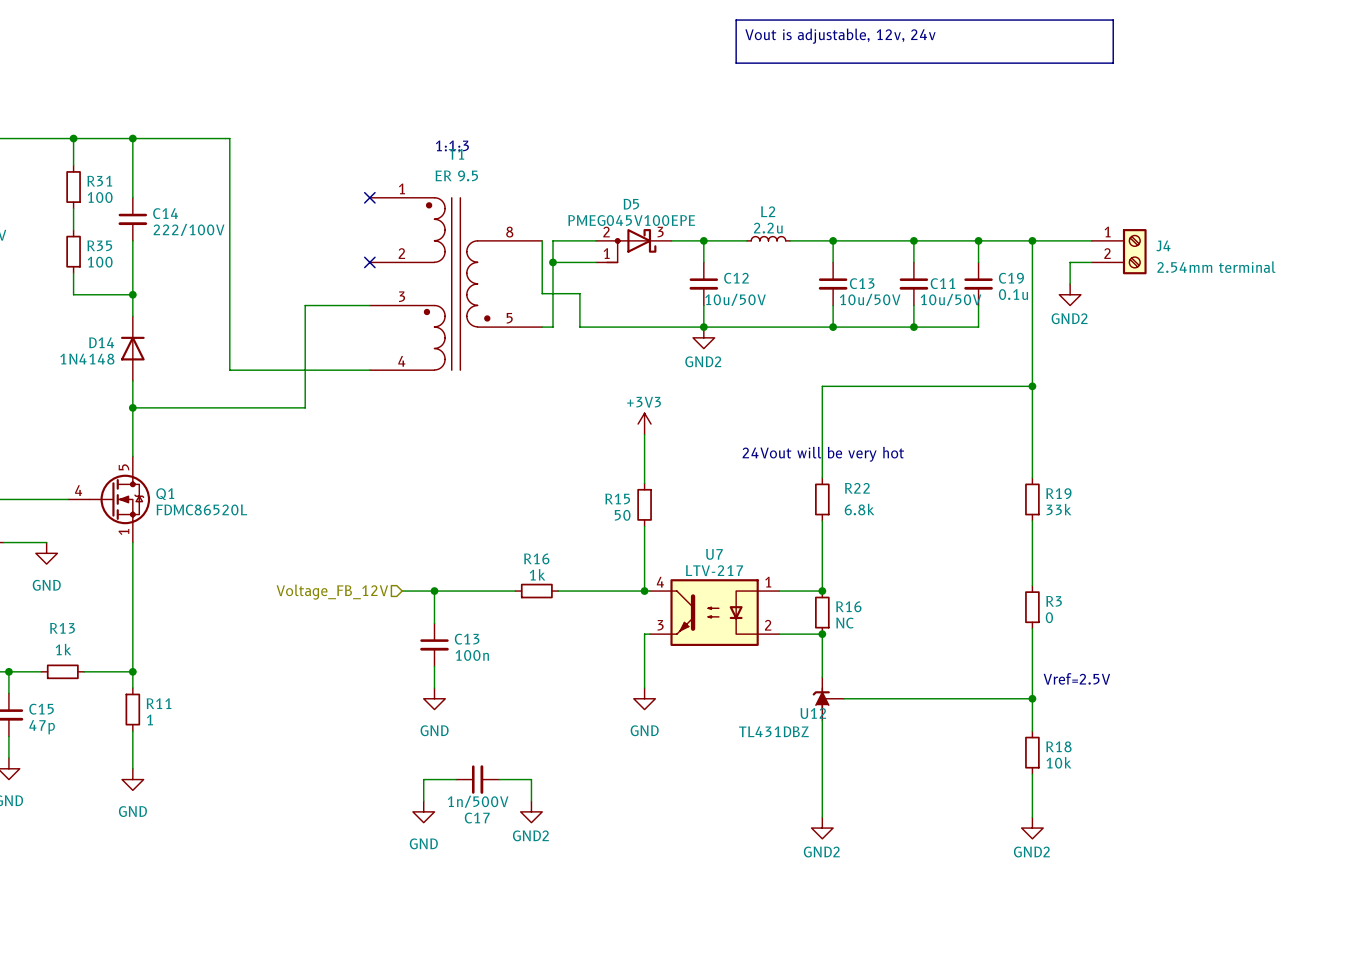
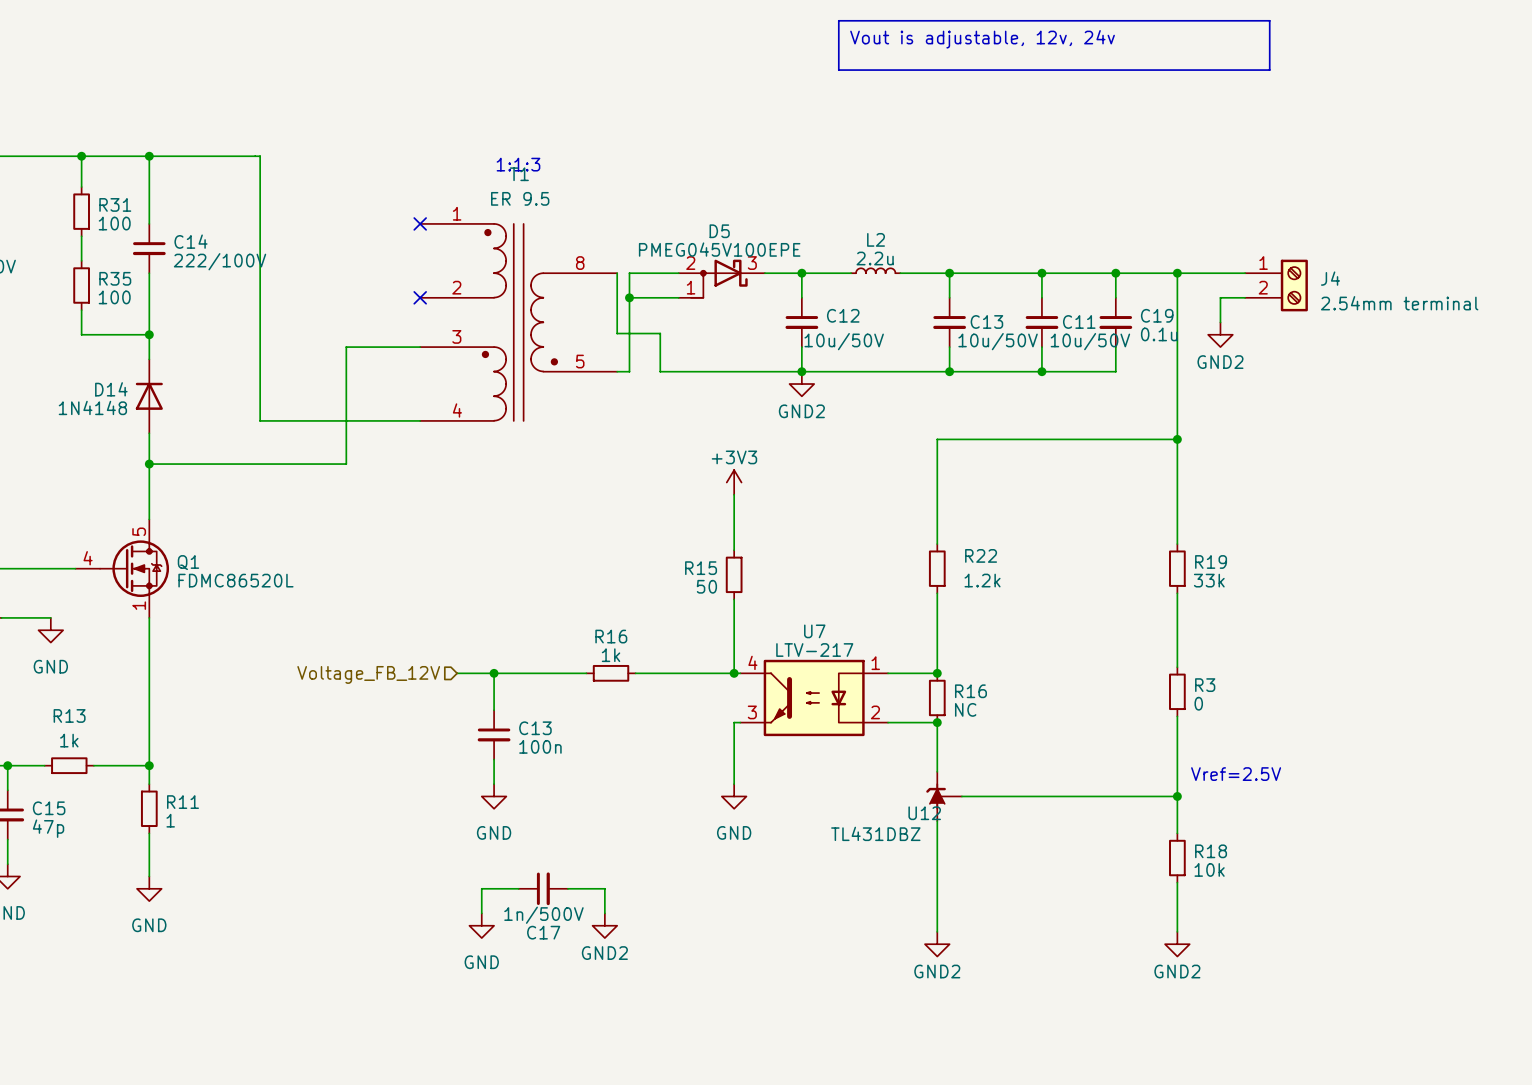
text: 24Vout will be very hot (823, 454) -> none
R22 value: 6.8k (859, 509) -> 1.2k (982, 580)

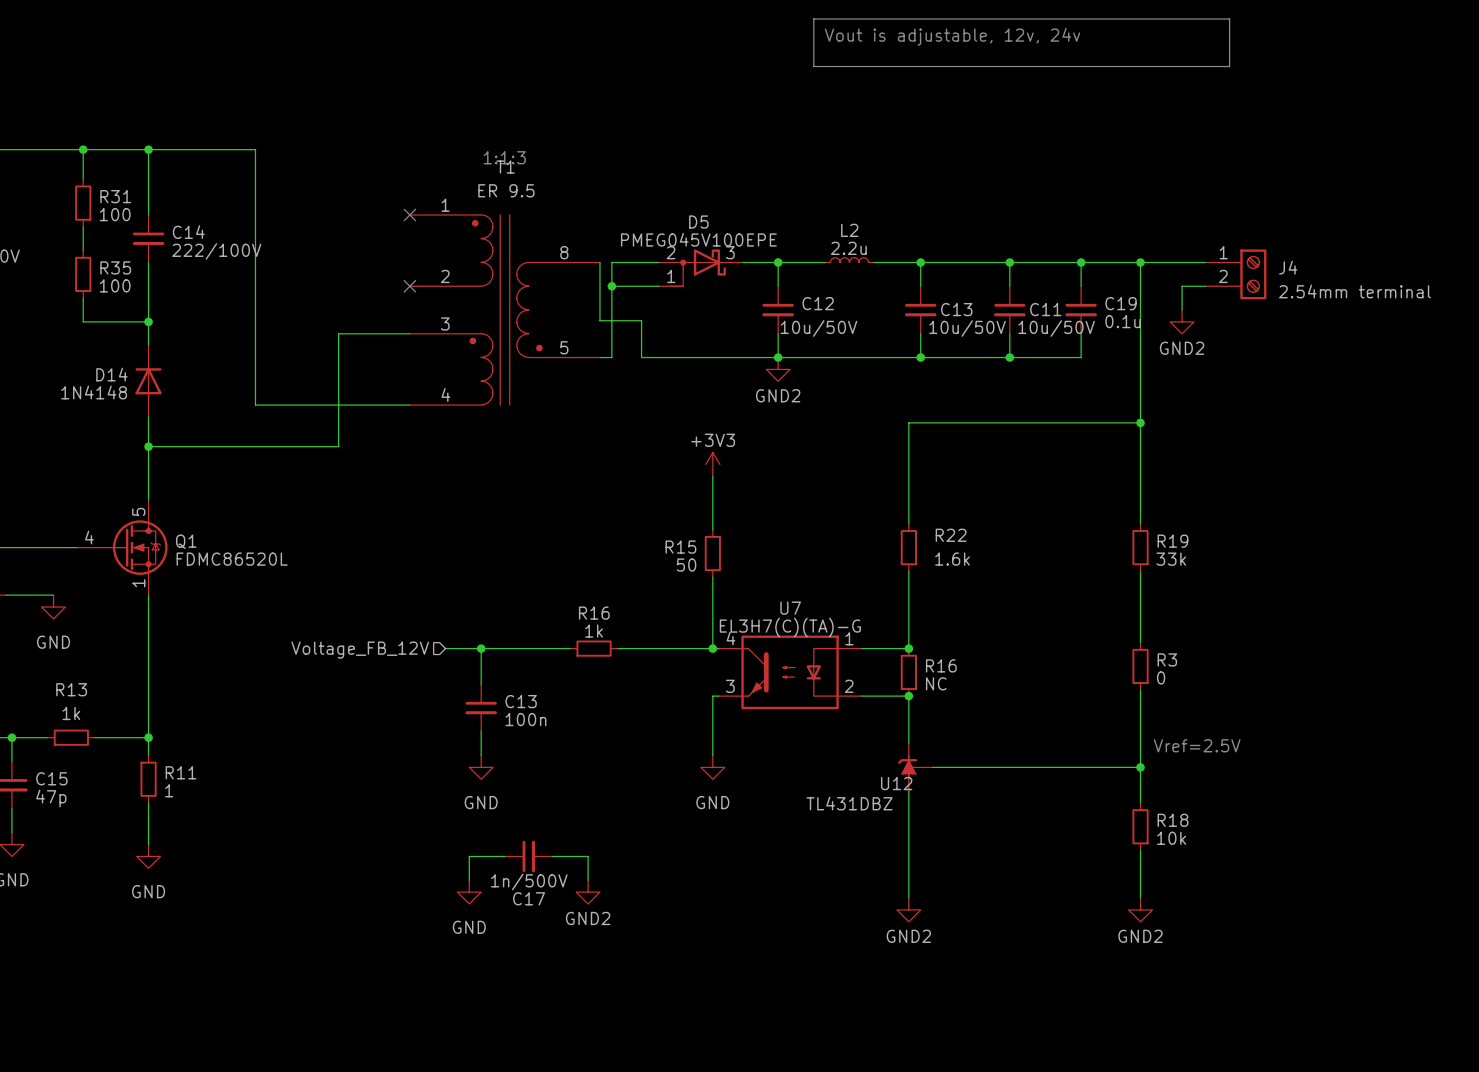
R22 value: 1.2k (982, 580) -> 1.6k (952, 559)
U7 value: LTV-217 (814, 650) -> EL3H7(C)(TA)-G (790, 627)

